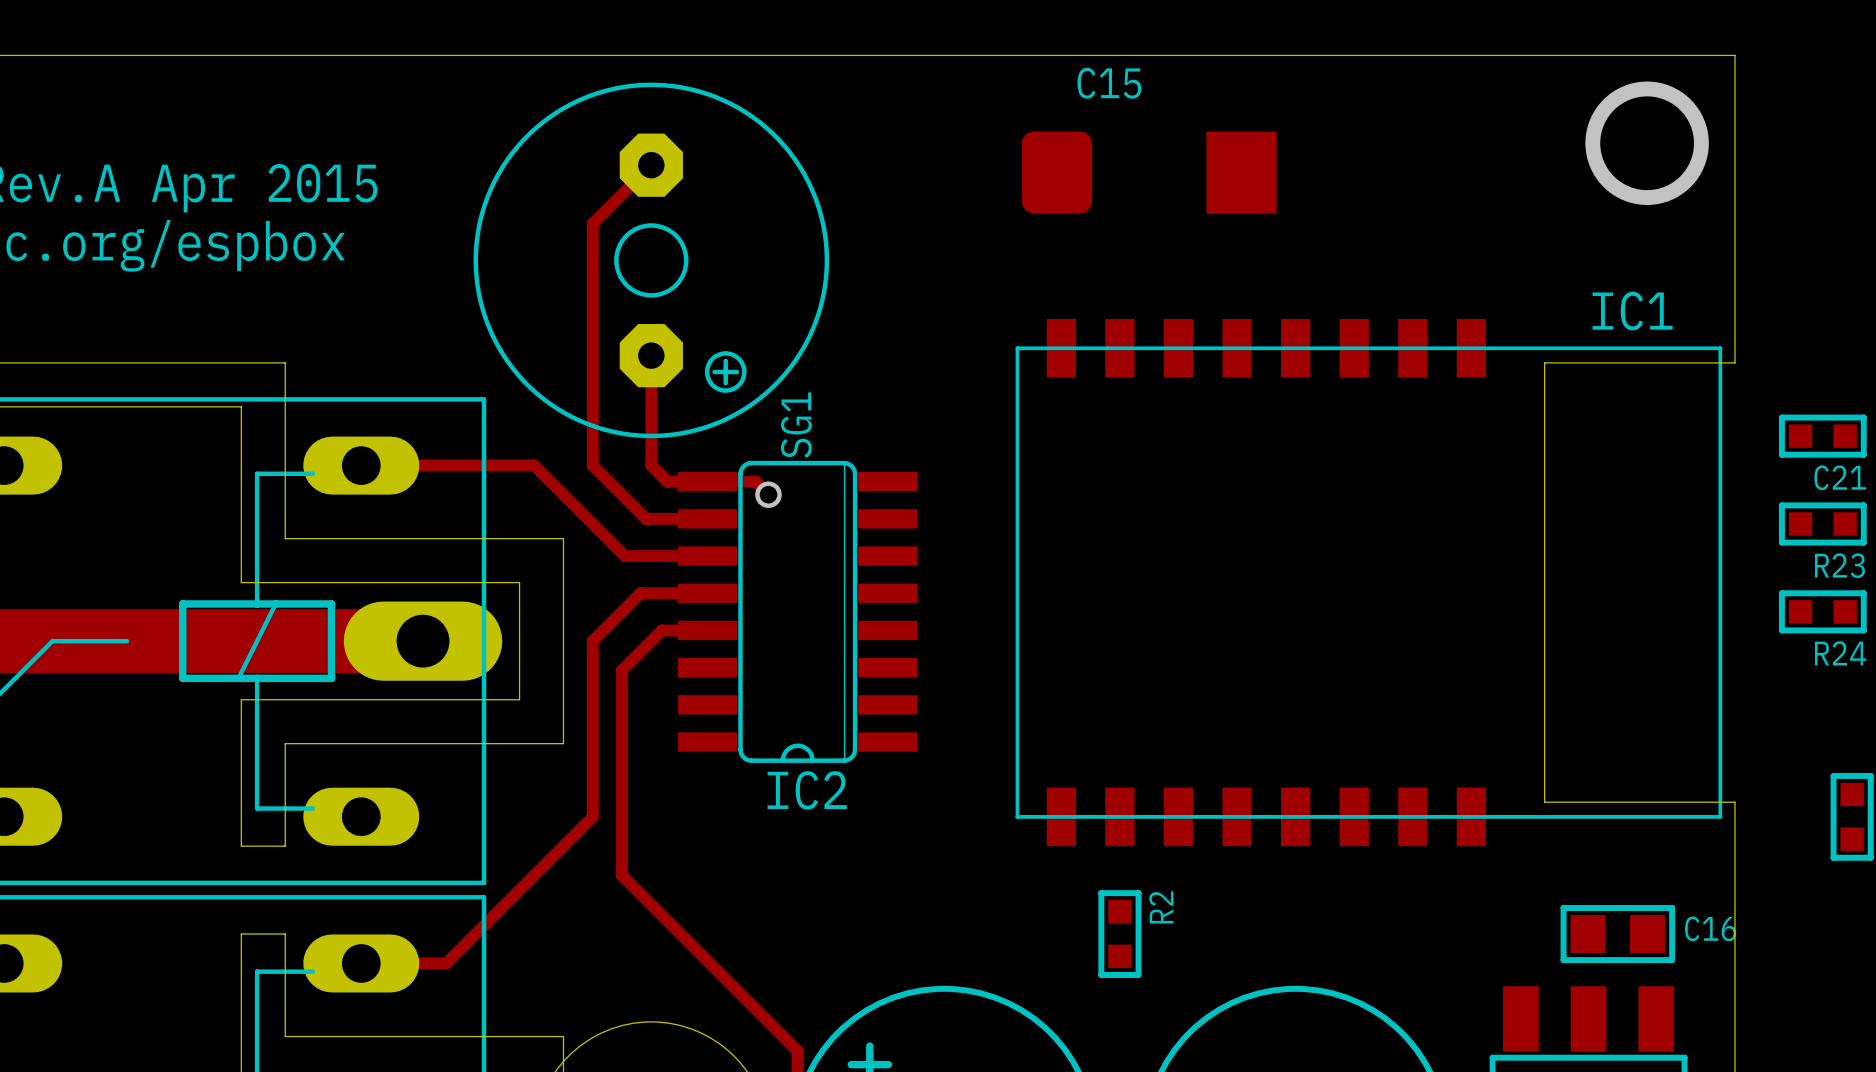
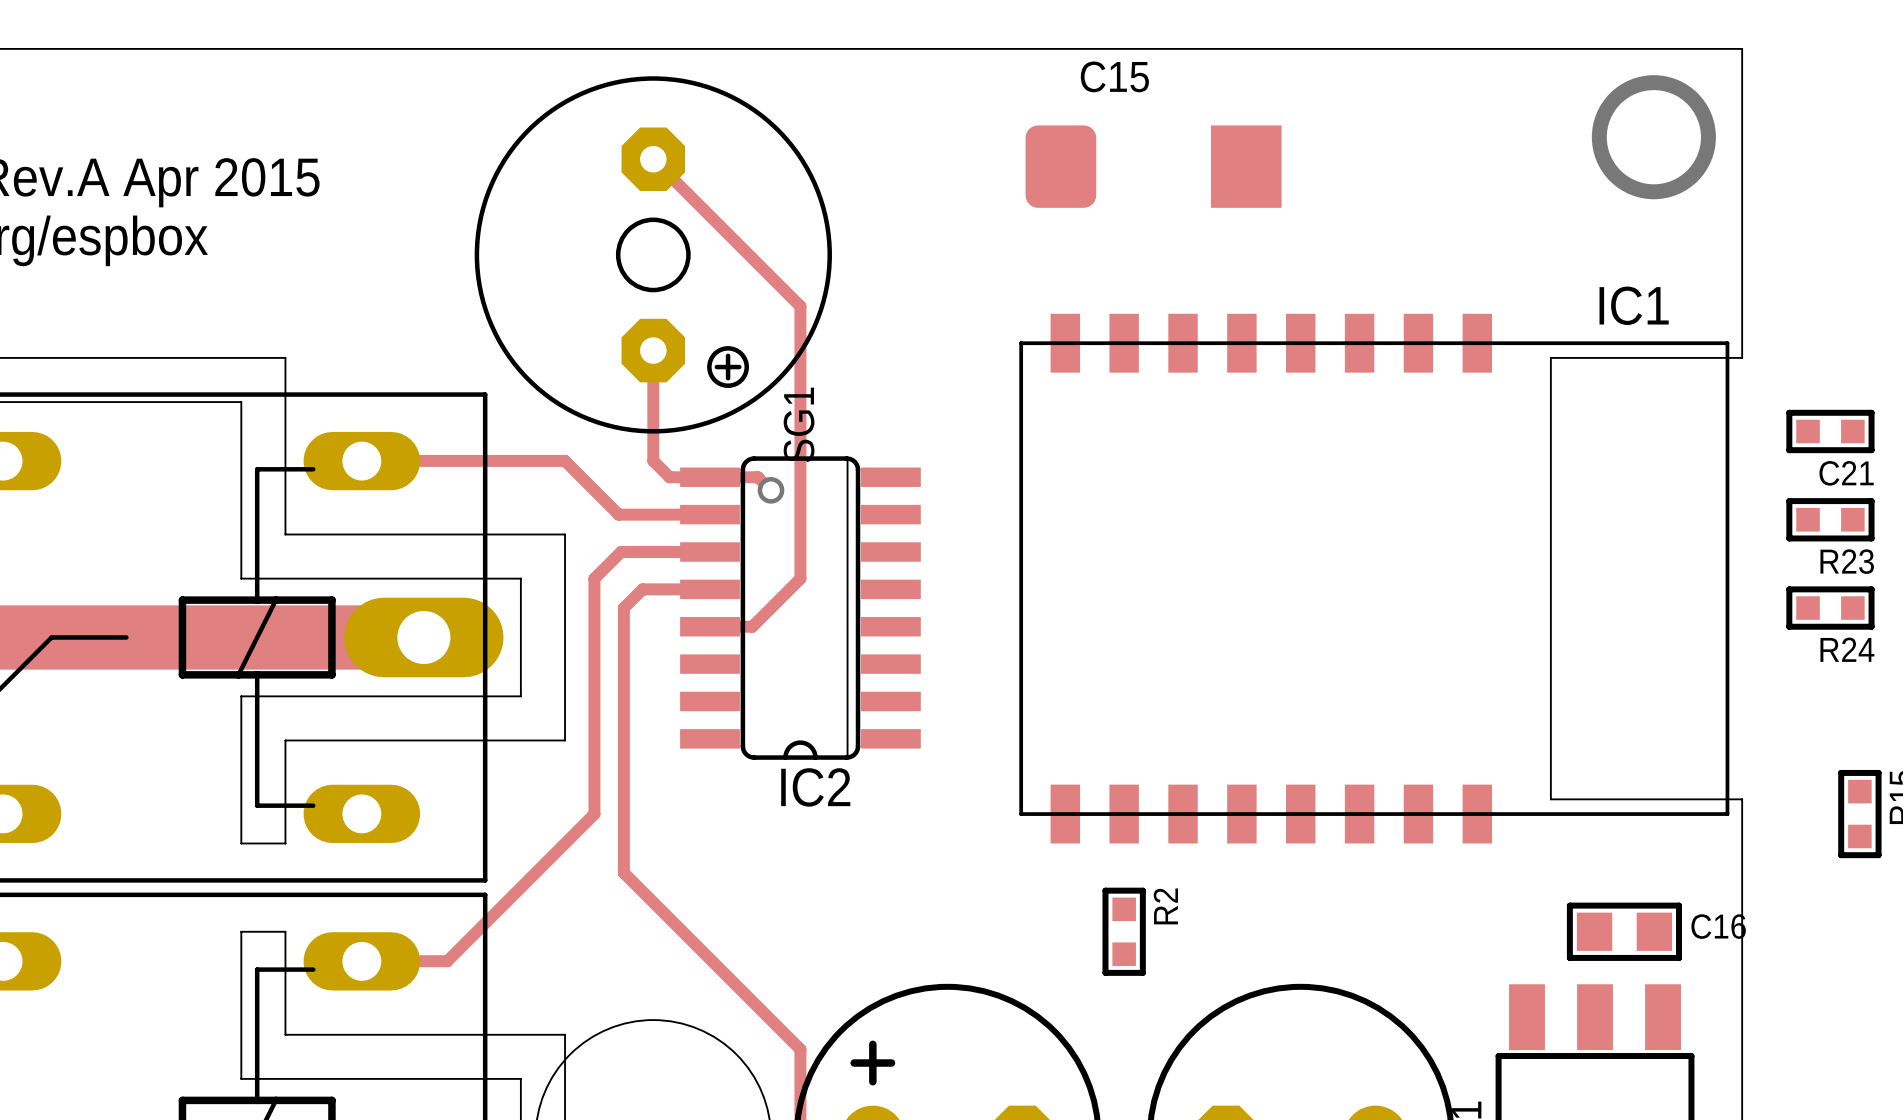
track: (651, 165) (592, 223) (592, 465) (646, 518) -> (653, 159) (800, 306) (800, 578) (752, 626) (710, 626)
track: (534, 465) (624, 556) -> (535, 460) (565, 460) (618, 514) (648, 514)
track: none -> (626, 552) (621, 552) (594, 578) (594, 637)
track: (622, 611) (592, 641) -> (623, 608) (623, 666)
track: (707, 630) (662, 630) (622, 670) -> none

